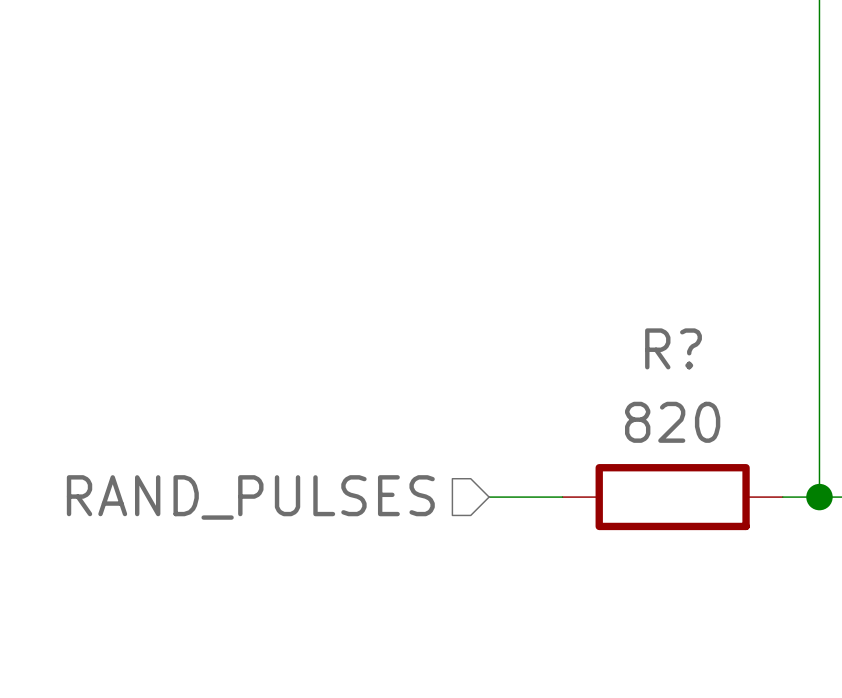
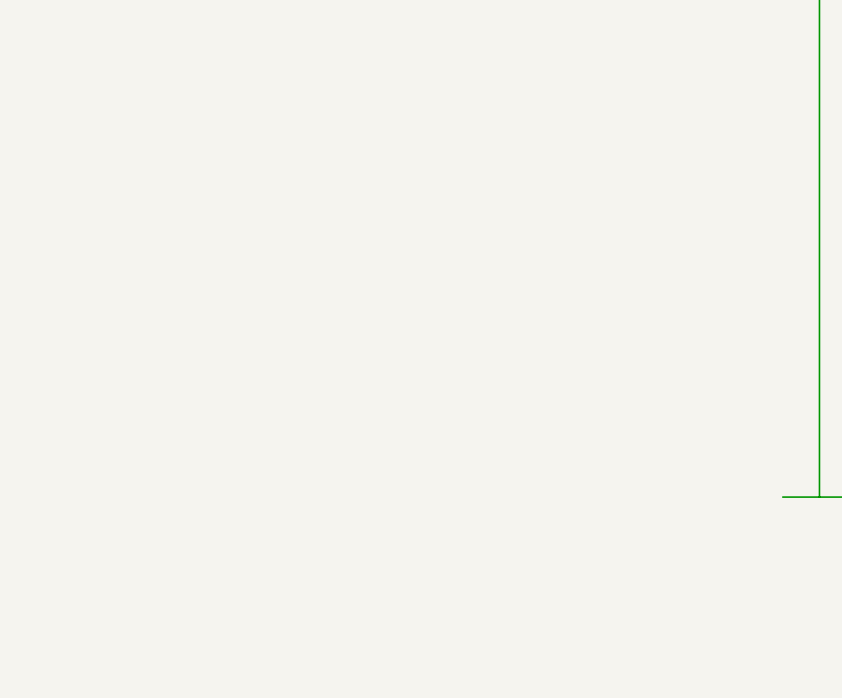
hierarchical label: RAND_PULSES (250, 497) -> none
wire: (489, 497) (562, 497) -> none
R?: 820 (672, 497) -> none
junction: (819, 497) -> none

